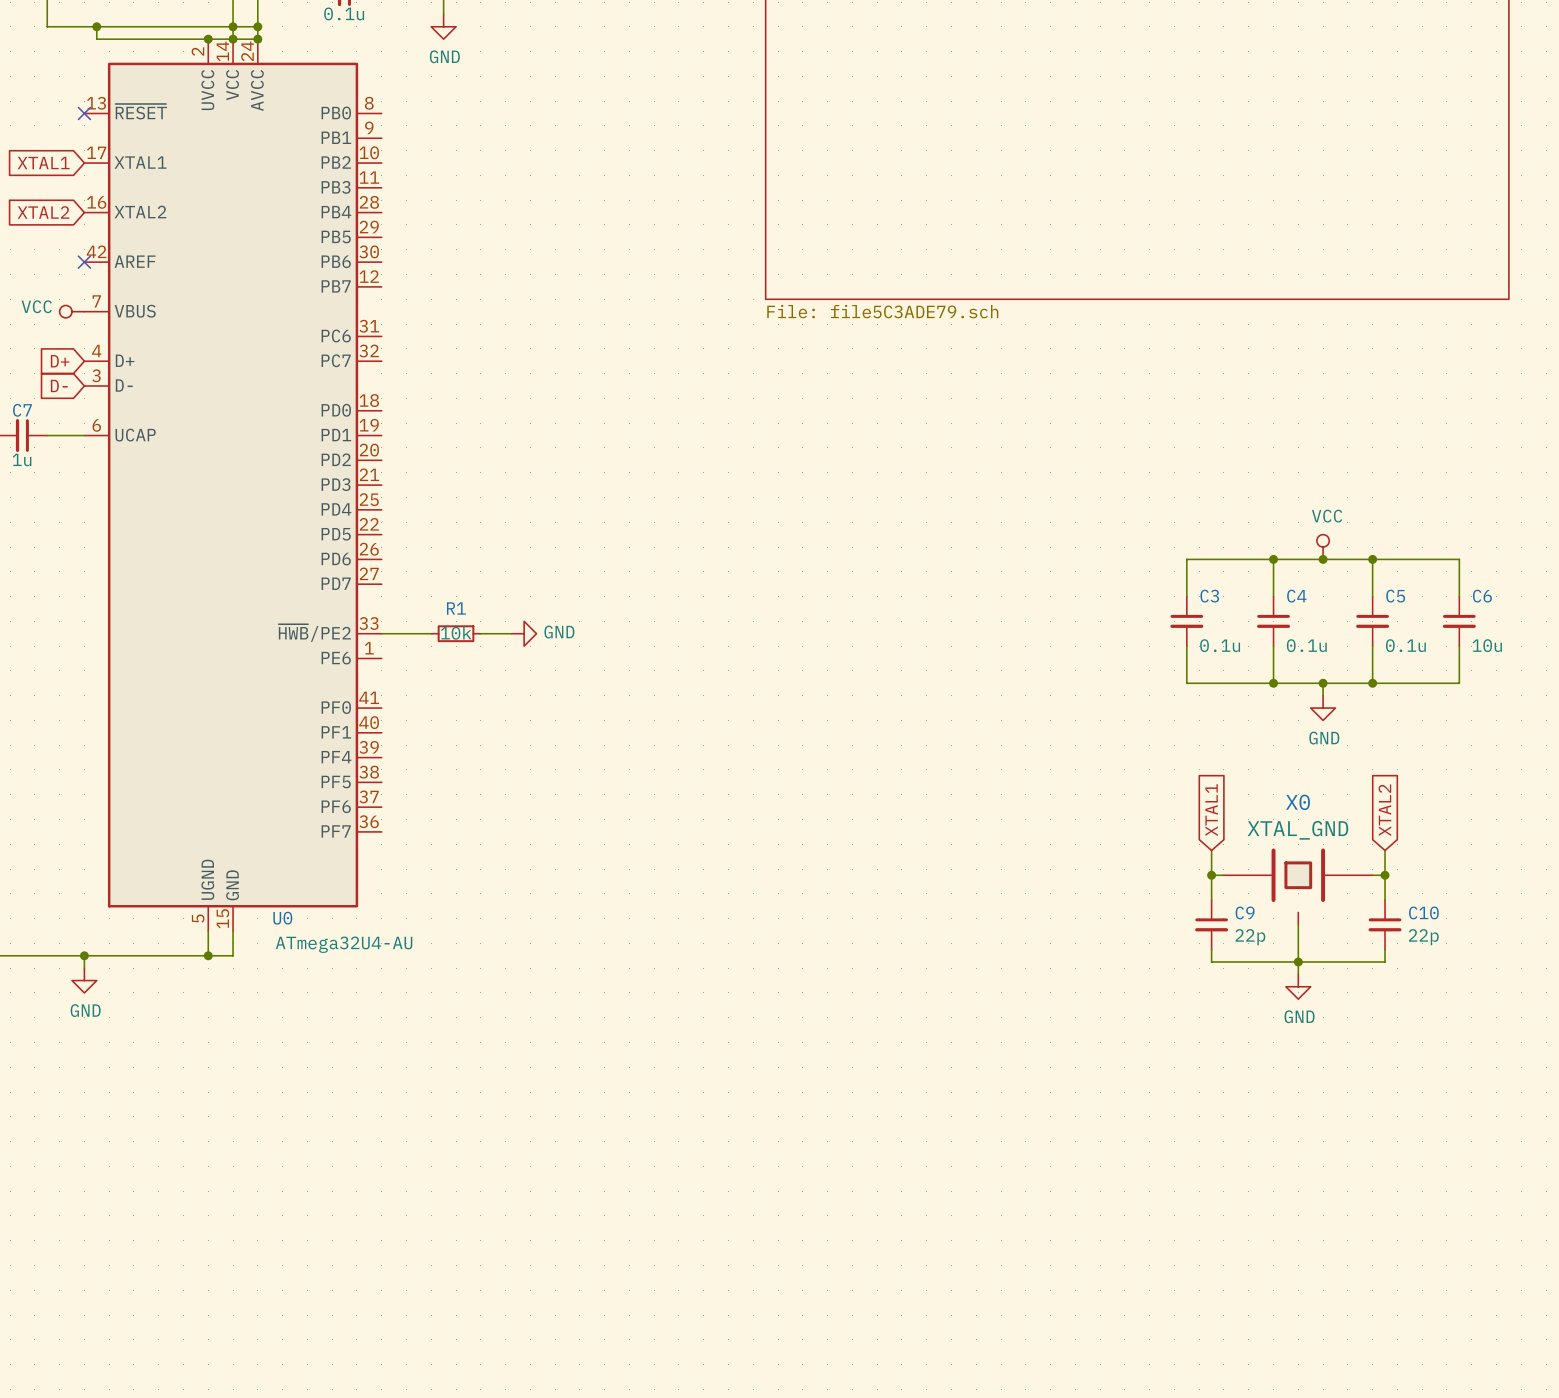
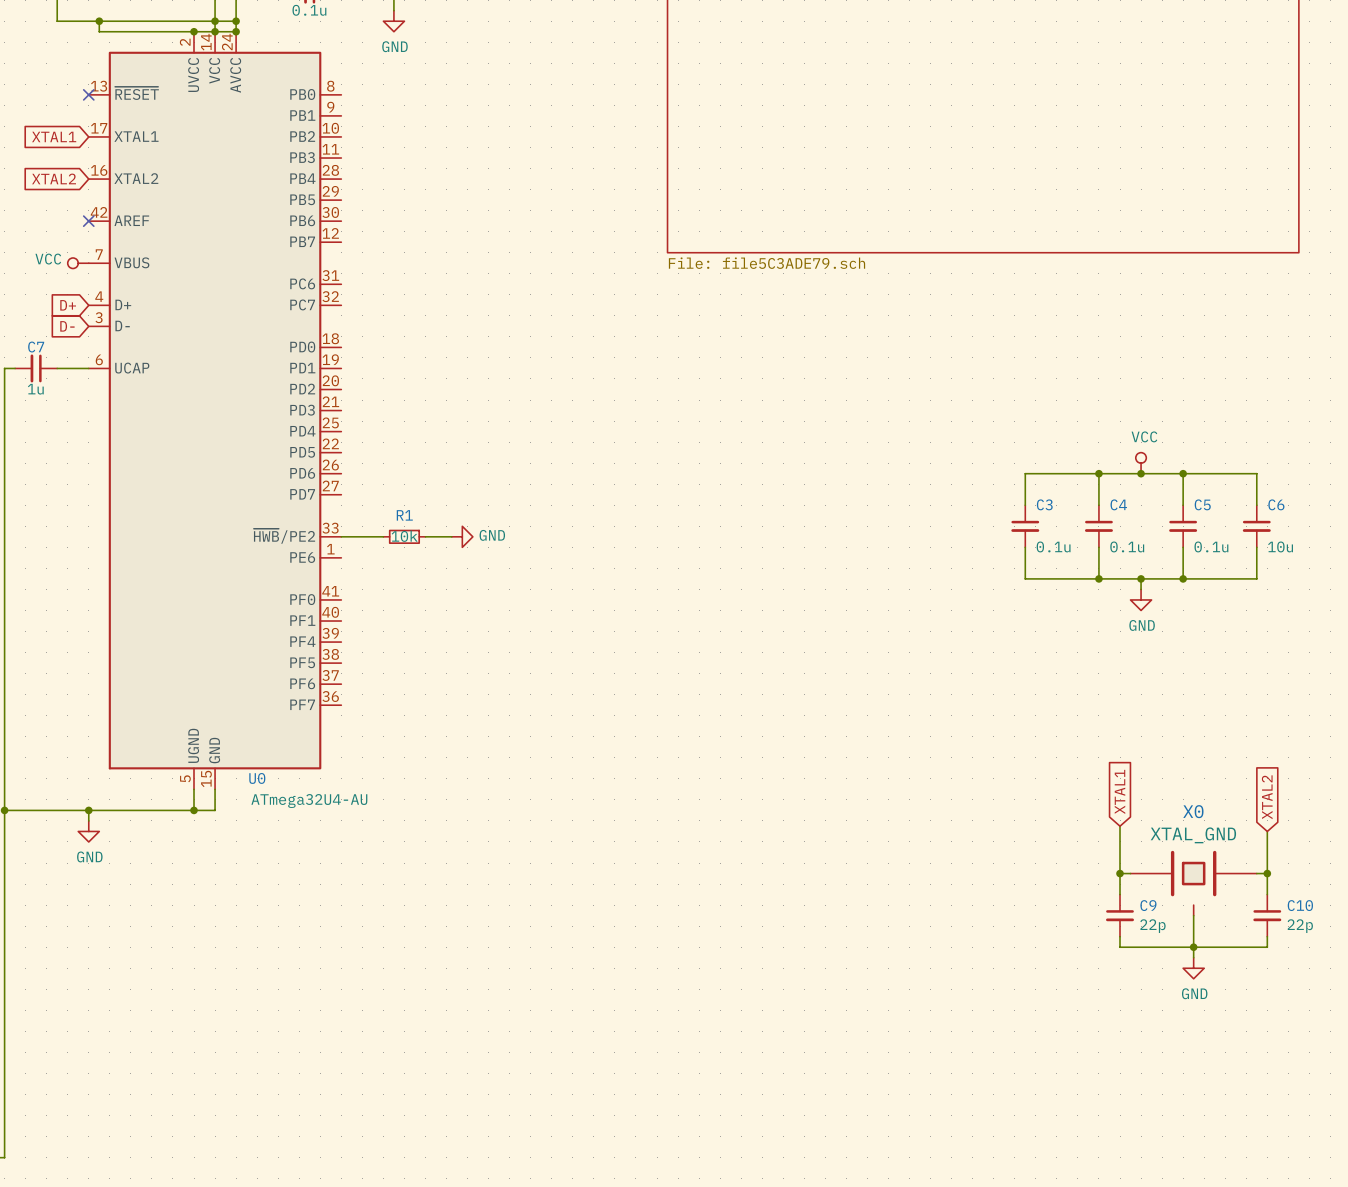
global label position: XTAL1 (1211, 810) -> XTAL1 (1120, 791)
global label position: XTAL2 (1384, 810) -> XTAL2 (1267, 797)
wire: (1211, 850) (1211, 900) -> none
wire: (1385, 850) (1385, 900) -> (1193, 915) (1193, 957)
wire: (1211, 875) (1223, 875) -> (1120, 873) (1130, 873)
junction: (1211, 875) -> none
wire: (1372, 875) (1385, 875) -> (1256, 873) (1267, 873)
junction: (1385, 875) -> none
X0 position: (1298, 886) -> (1193, 883)
C9 position: (1211, 924) -> (1120, 915)
wire: (1298, 924) (1298, 974) -> (1120, 894) (1120, 826)
C10 position: (1385, 924) -> (1267, 915)
wire: (1211, 949) (1211, 961) (1385, 961) (1385, 949) -> (1120, 936) (1120, 947) (1267, 947) (1267, 936)
junction: (1298, 961) -> none
wire: none -> (1267, 831) (1267, 894)
power symbol position: GND (1298, 986) -> GND (1193, 968)
junction: none -> (1120, 873)
junction: none -> (1267, 873)
junction: none -> (1193, 947)

